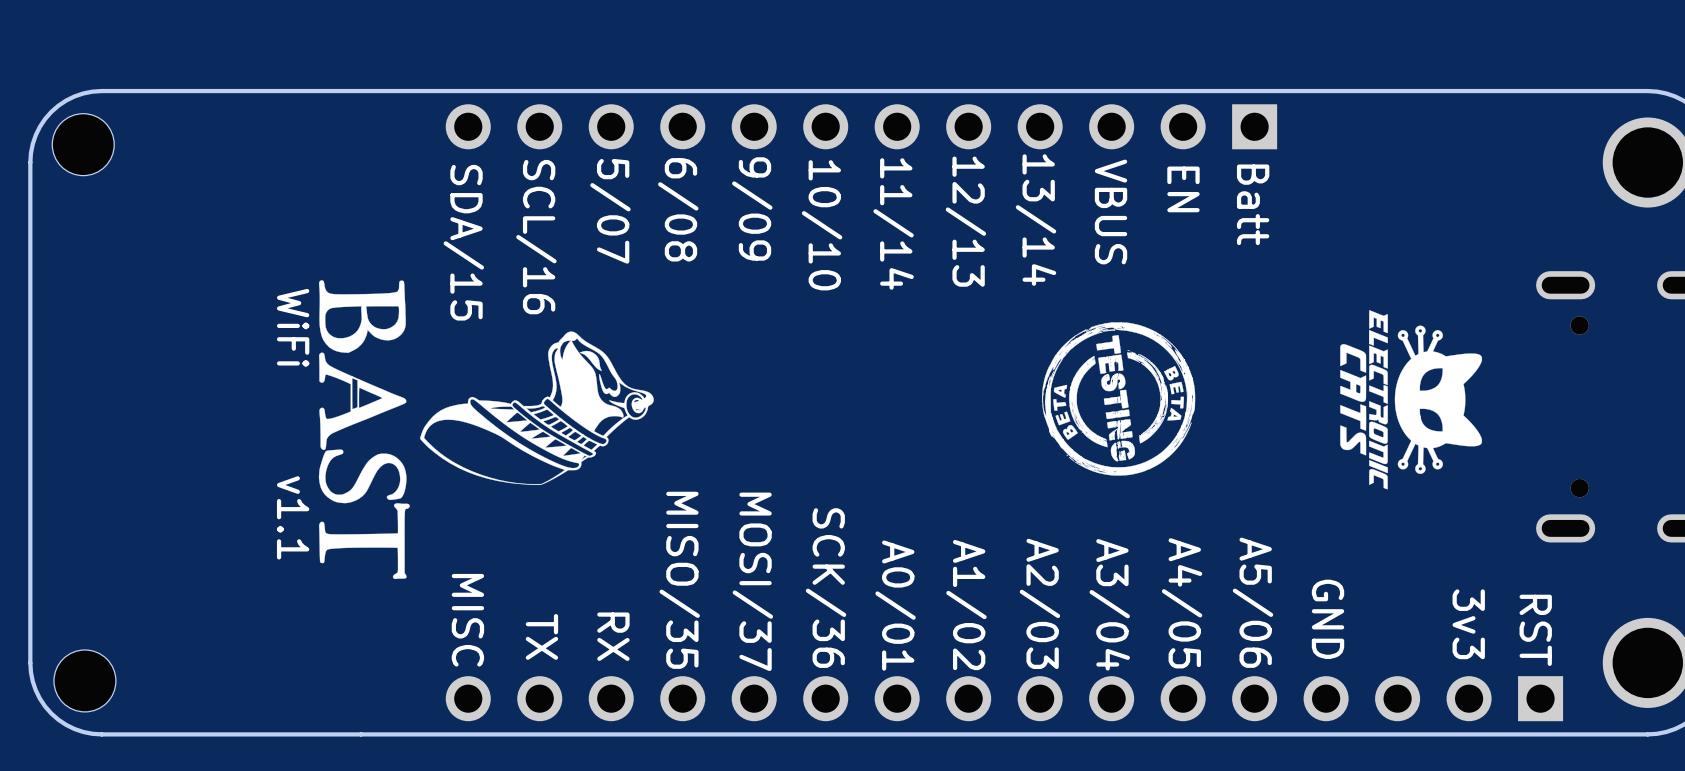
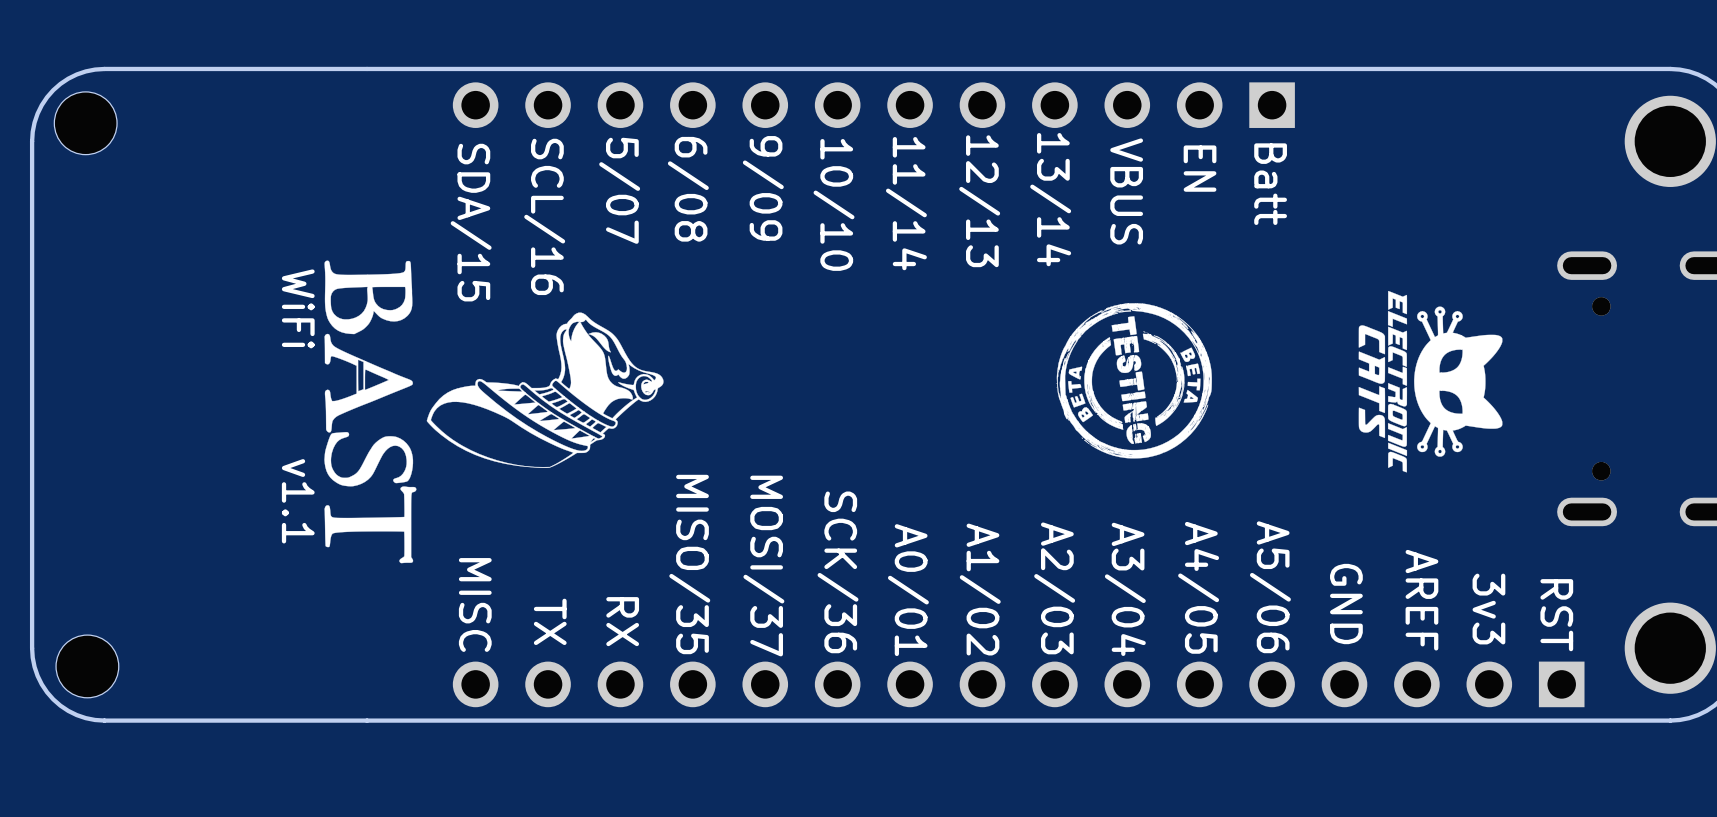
text: none -> AREF (1421, 600)

